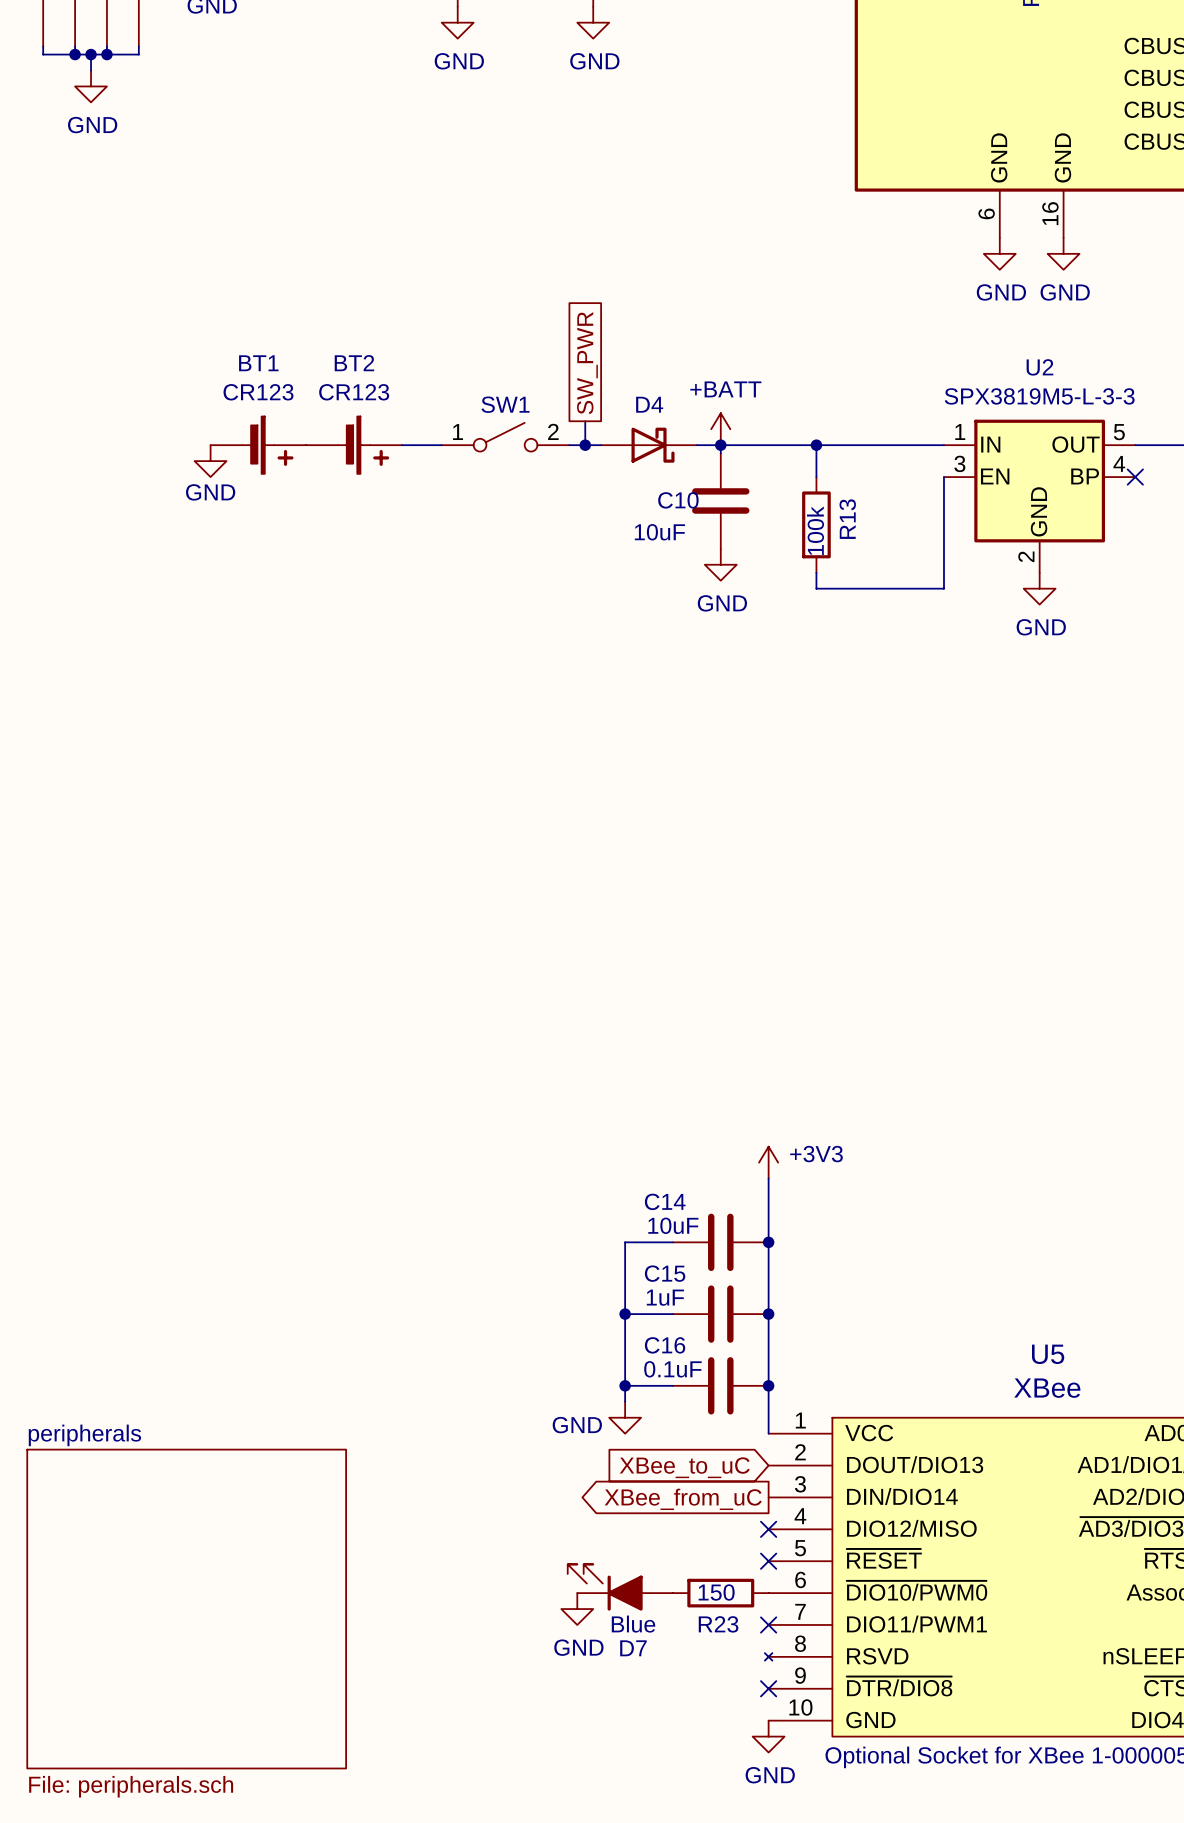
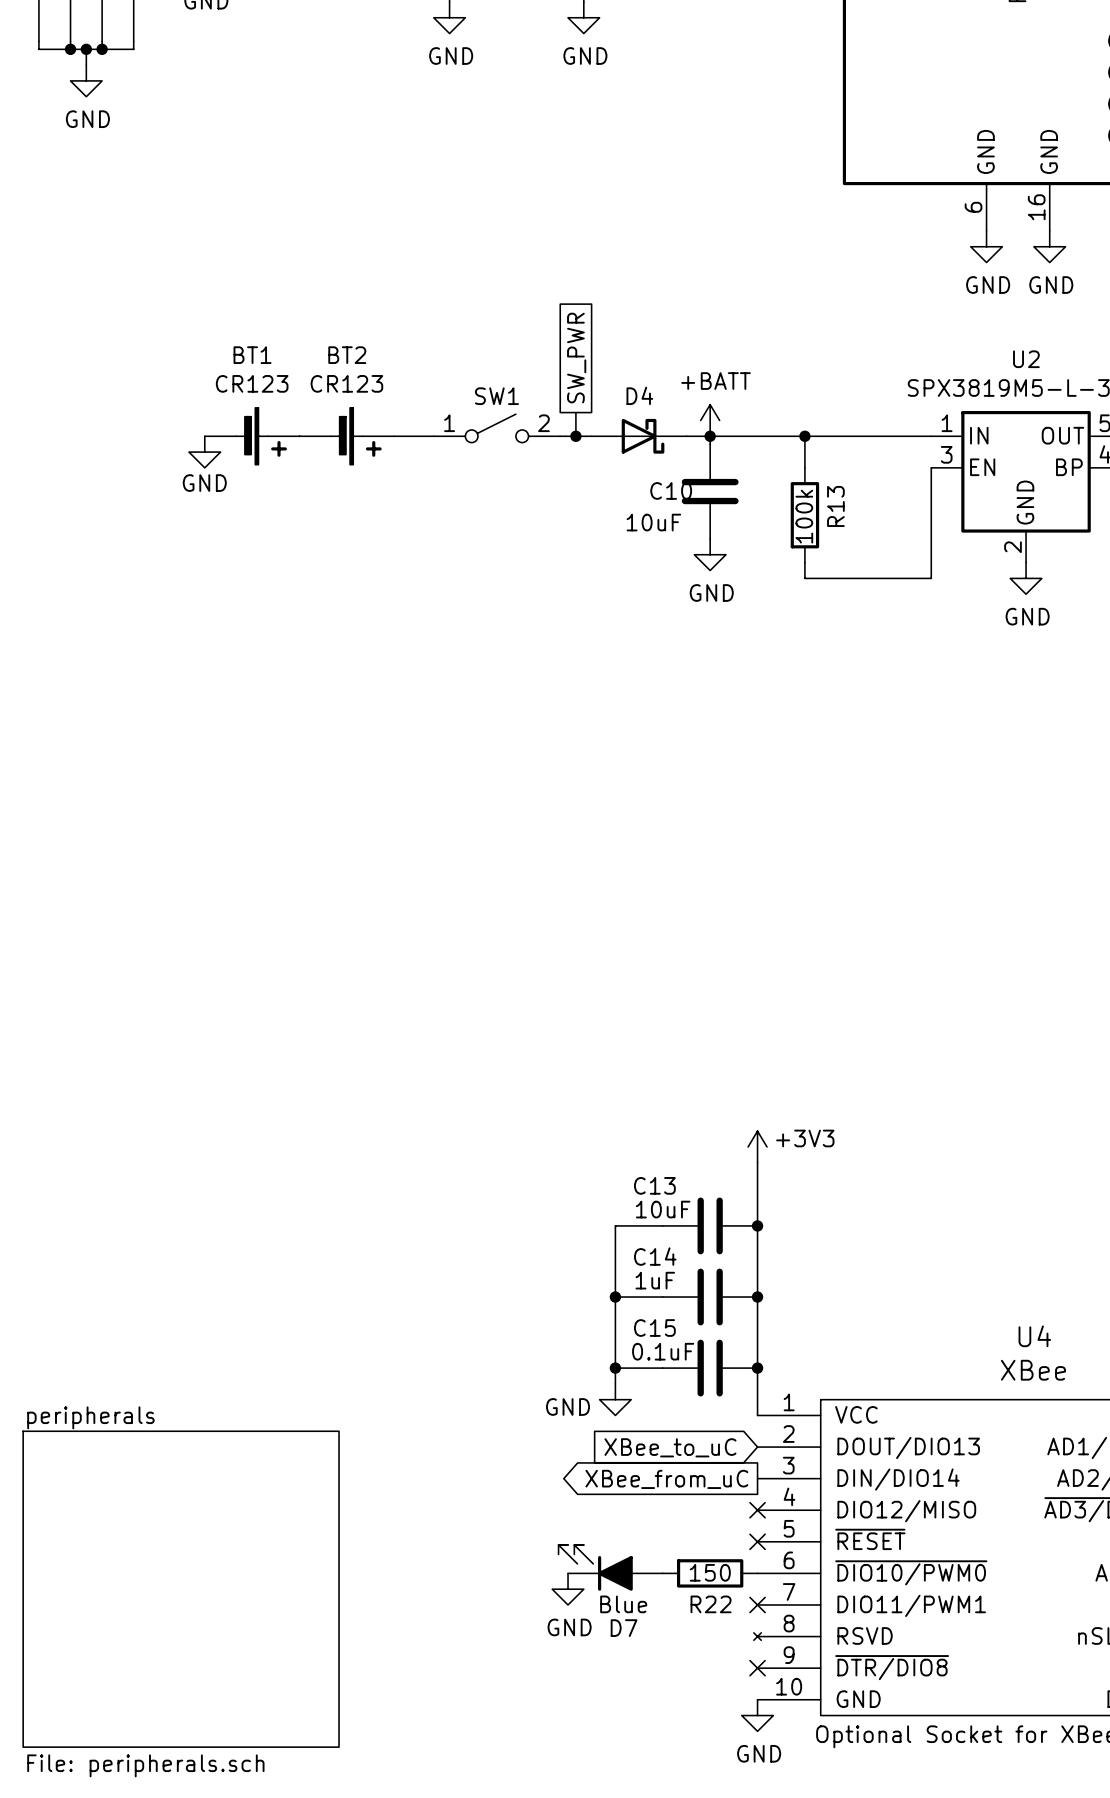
C14 name: C14 (665, 1201) -> C13 (654, 1185)
C15 name: C15 (665, 1273) -> C14 (655, 1256)
C16 name: C16 (665, 1345) -> C15 (654, 1328)
U5 name: U5 (1048, 1354) -> U4 (1034, 1336)
R23 name: R23 (718, 1624) -> R22 (711, 1604)

